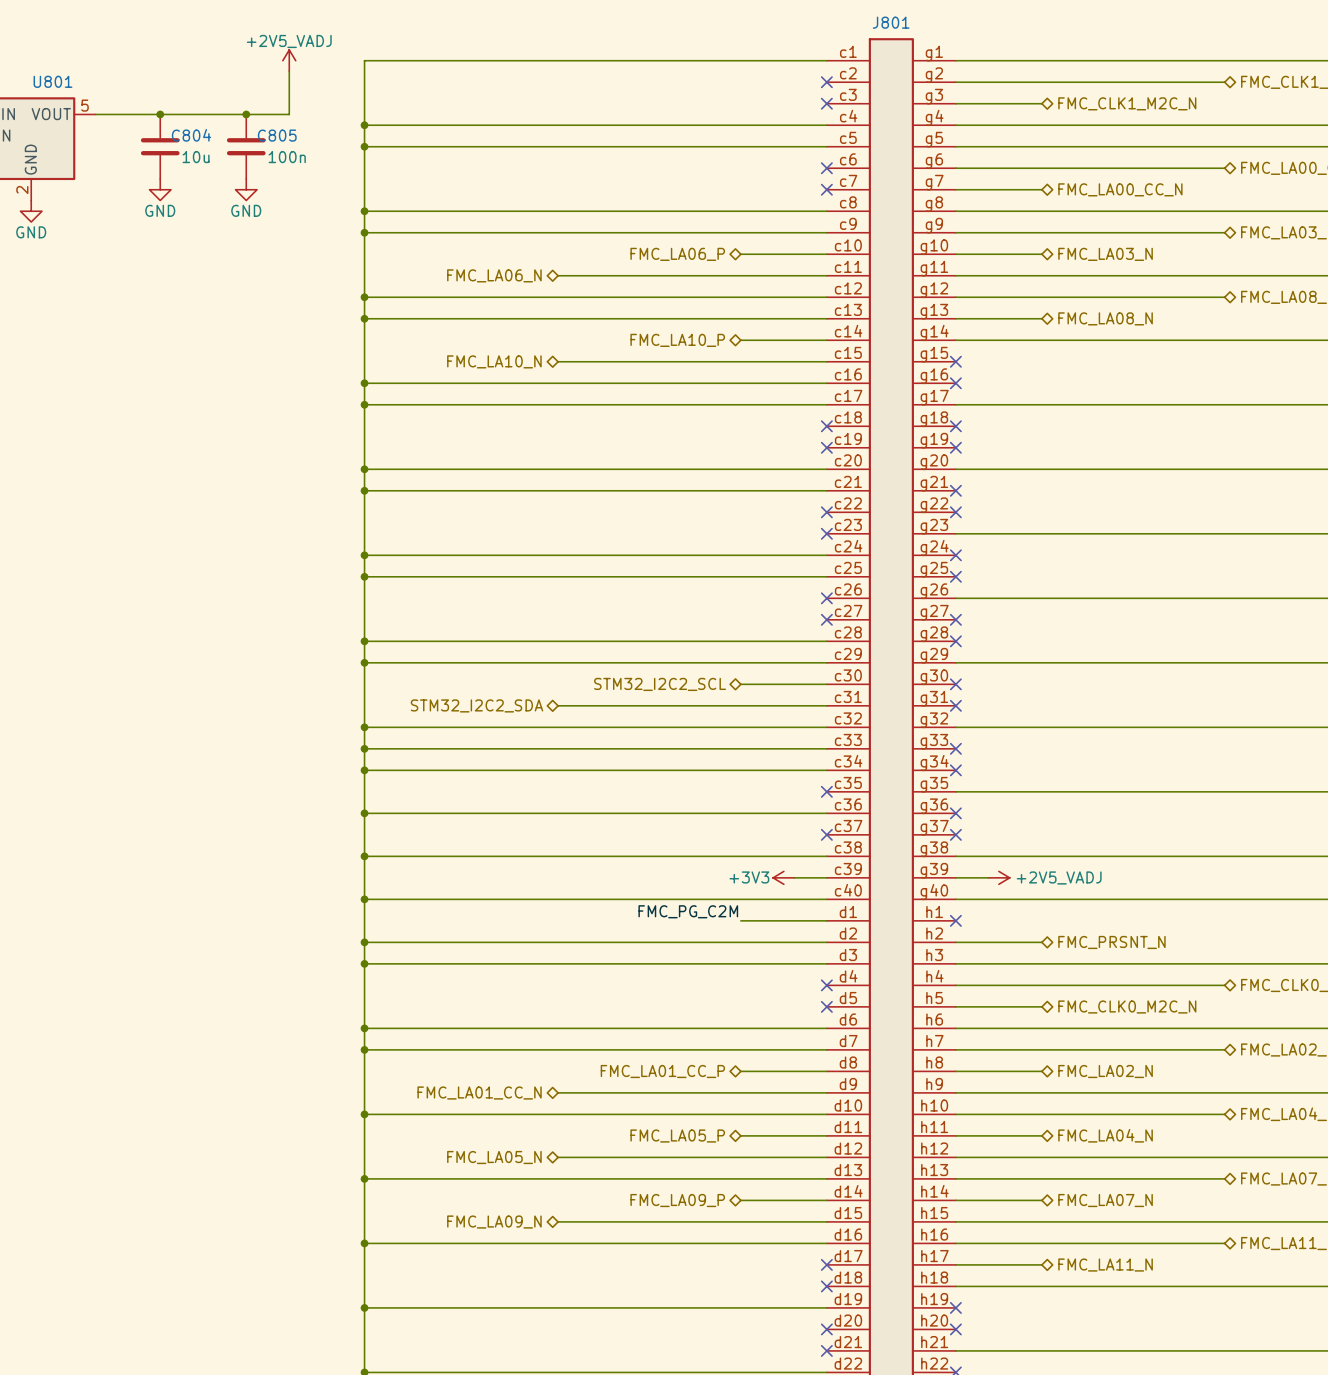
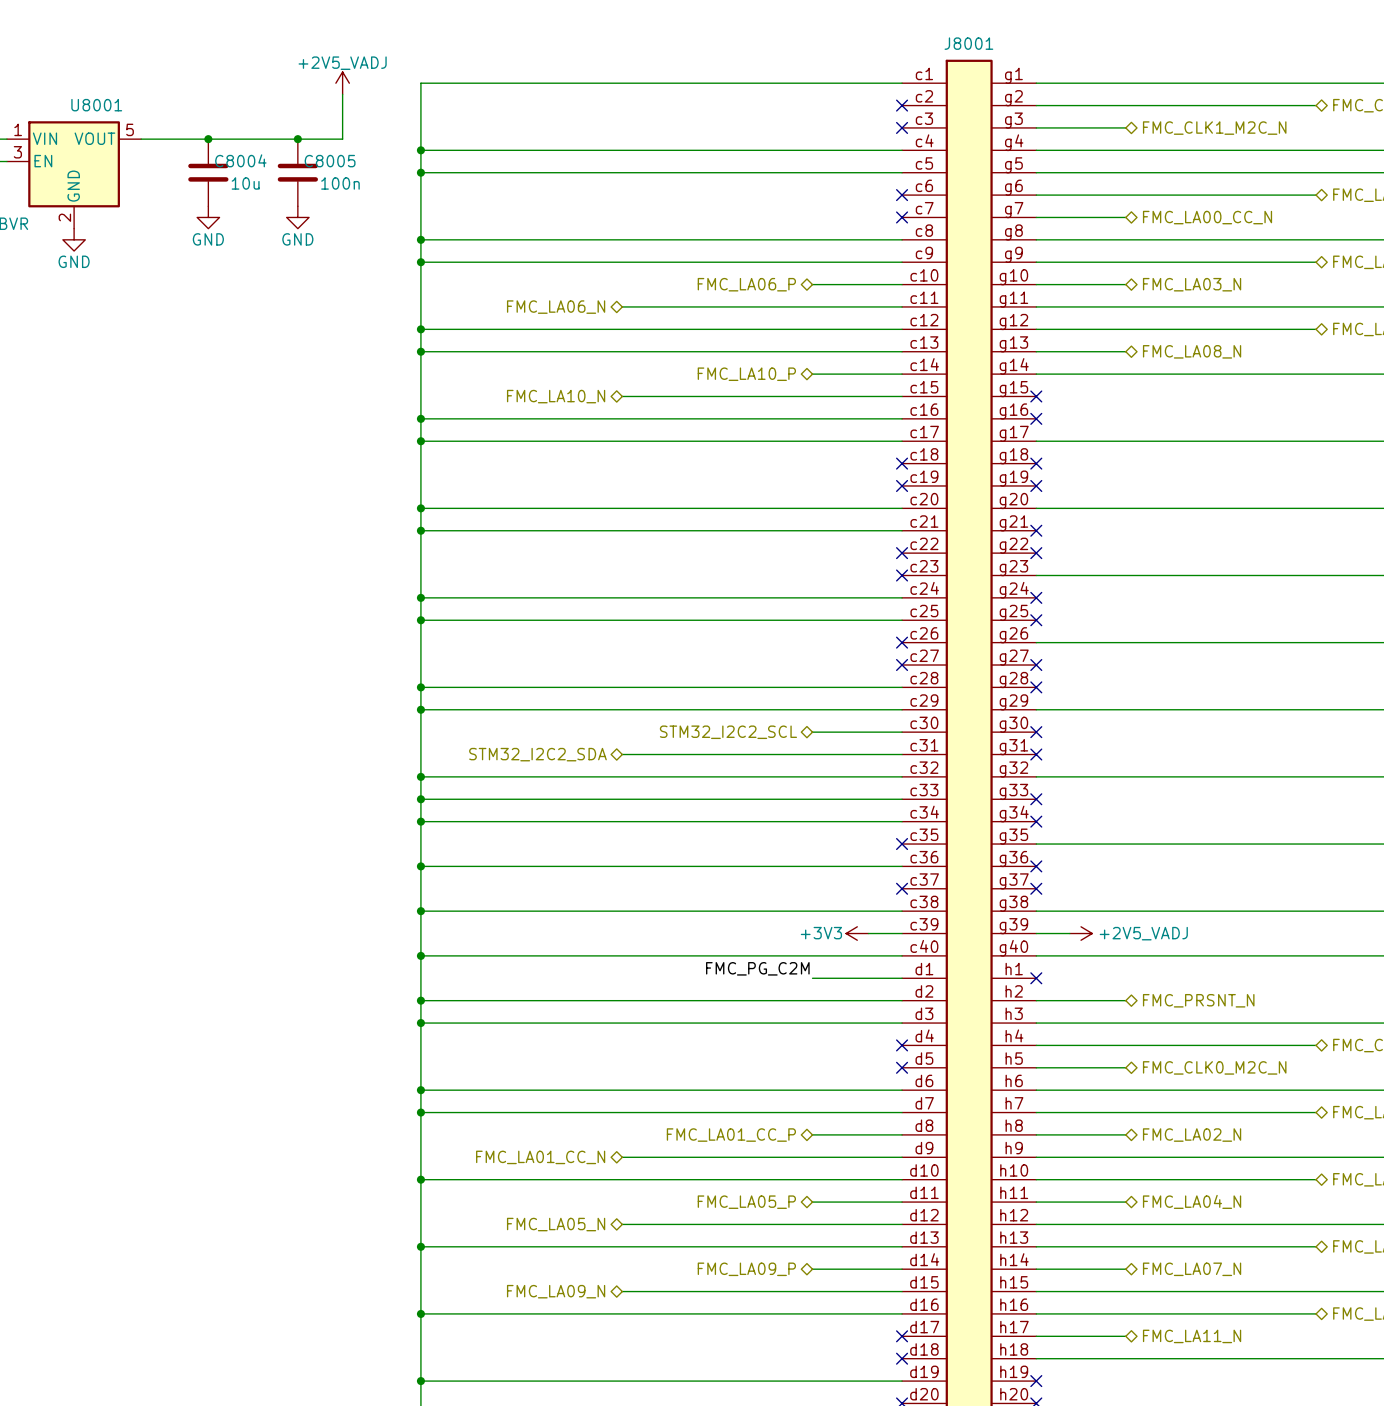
J801 name: J801 (891, 22) -> J8001 (968, 43)
U801 name: U801 (52, 81) -> U8001 (96, 105)
C804 name: C804 (191, 135) -> C8004 (240, 160)
C805 name: C805 (277, 135) -> C8005 (330, 161)

